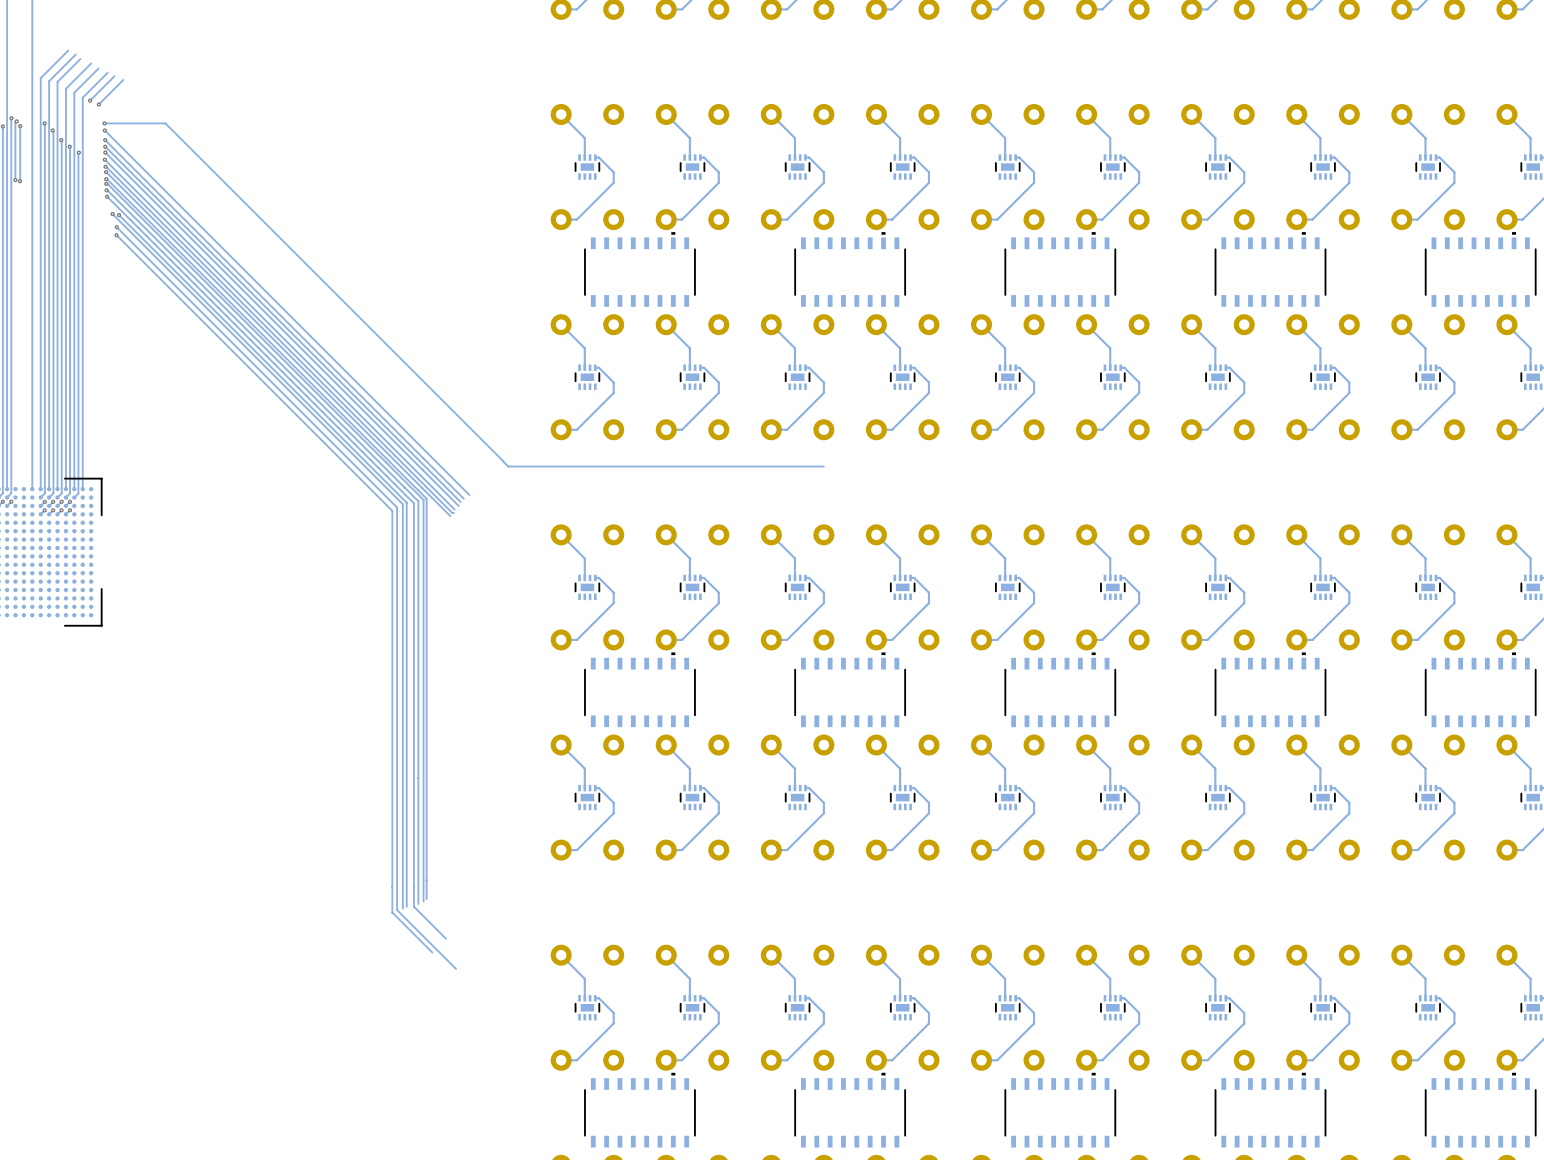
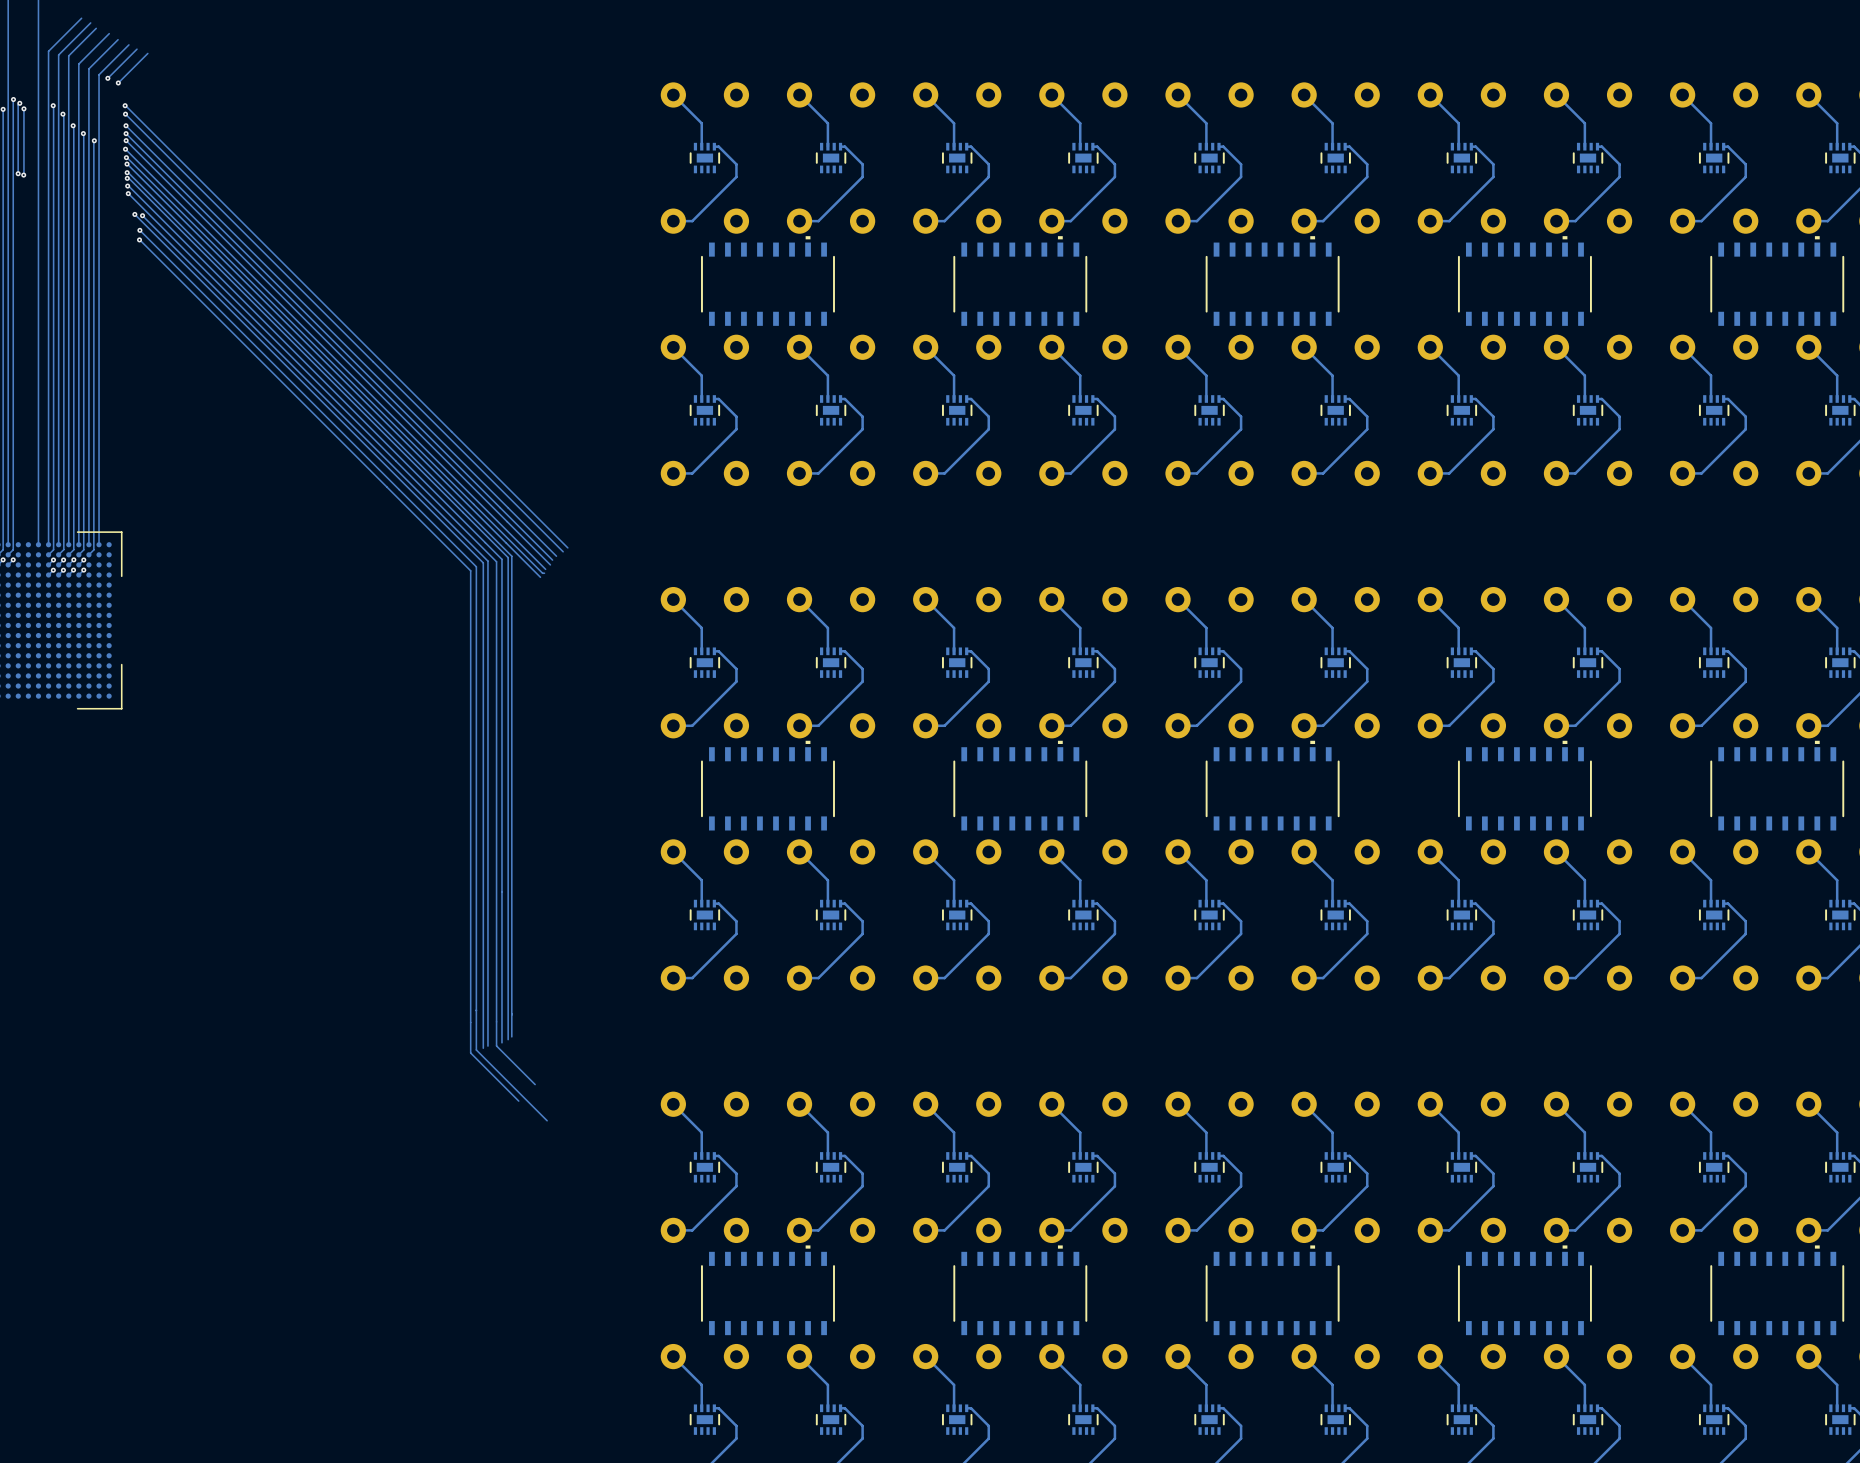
track: (104, 123) (165, 123) (508, 466) (823, 466) -> (125, 105) (567, 547)

